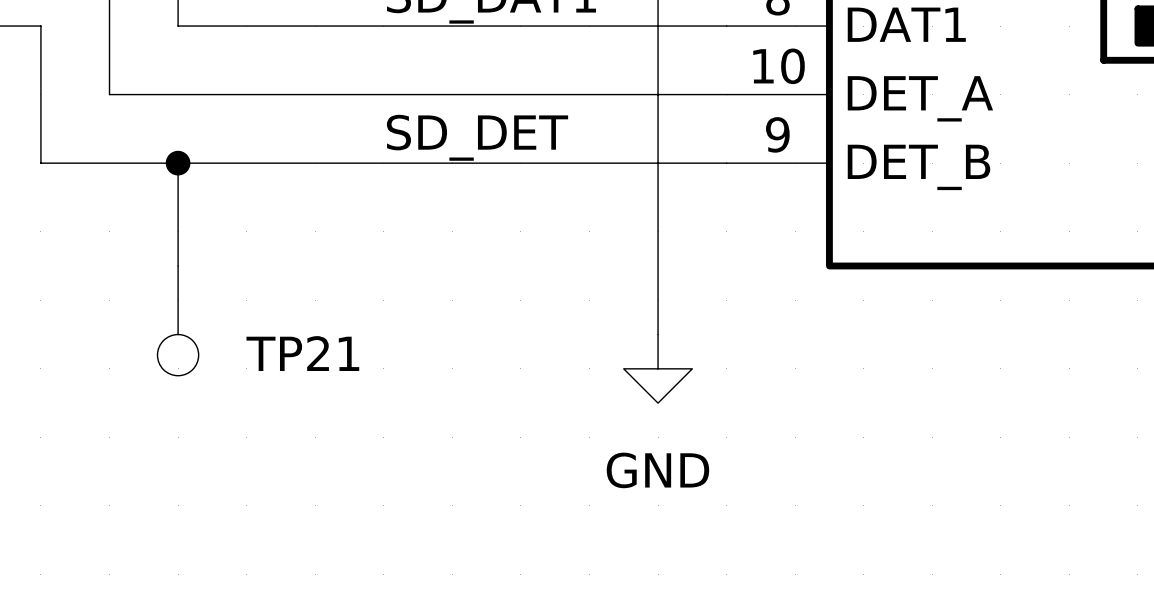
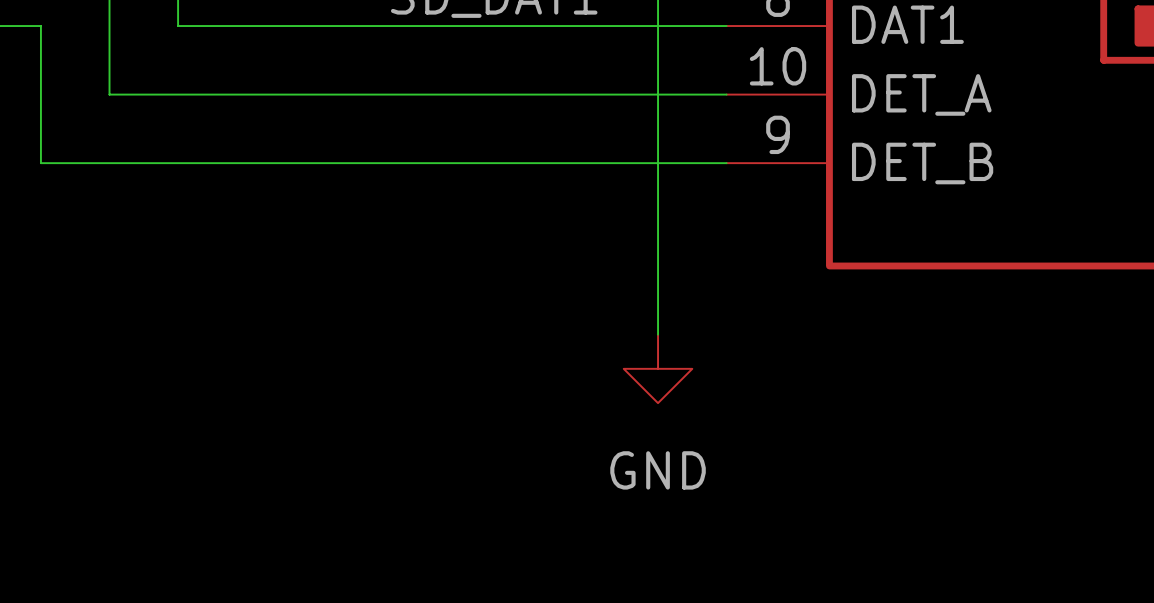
label: SD_DET (477, 137) -> none
wire: (178, 163) (178, 265) -> none
junction: (178, 163) -> none
TP21: (178, 320) -> none

